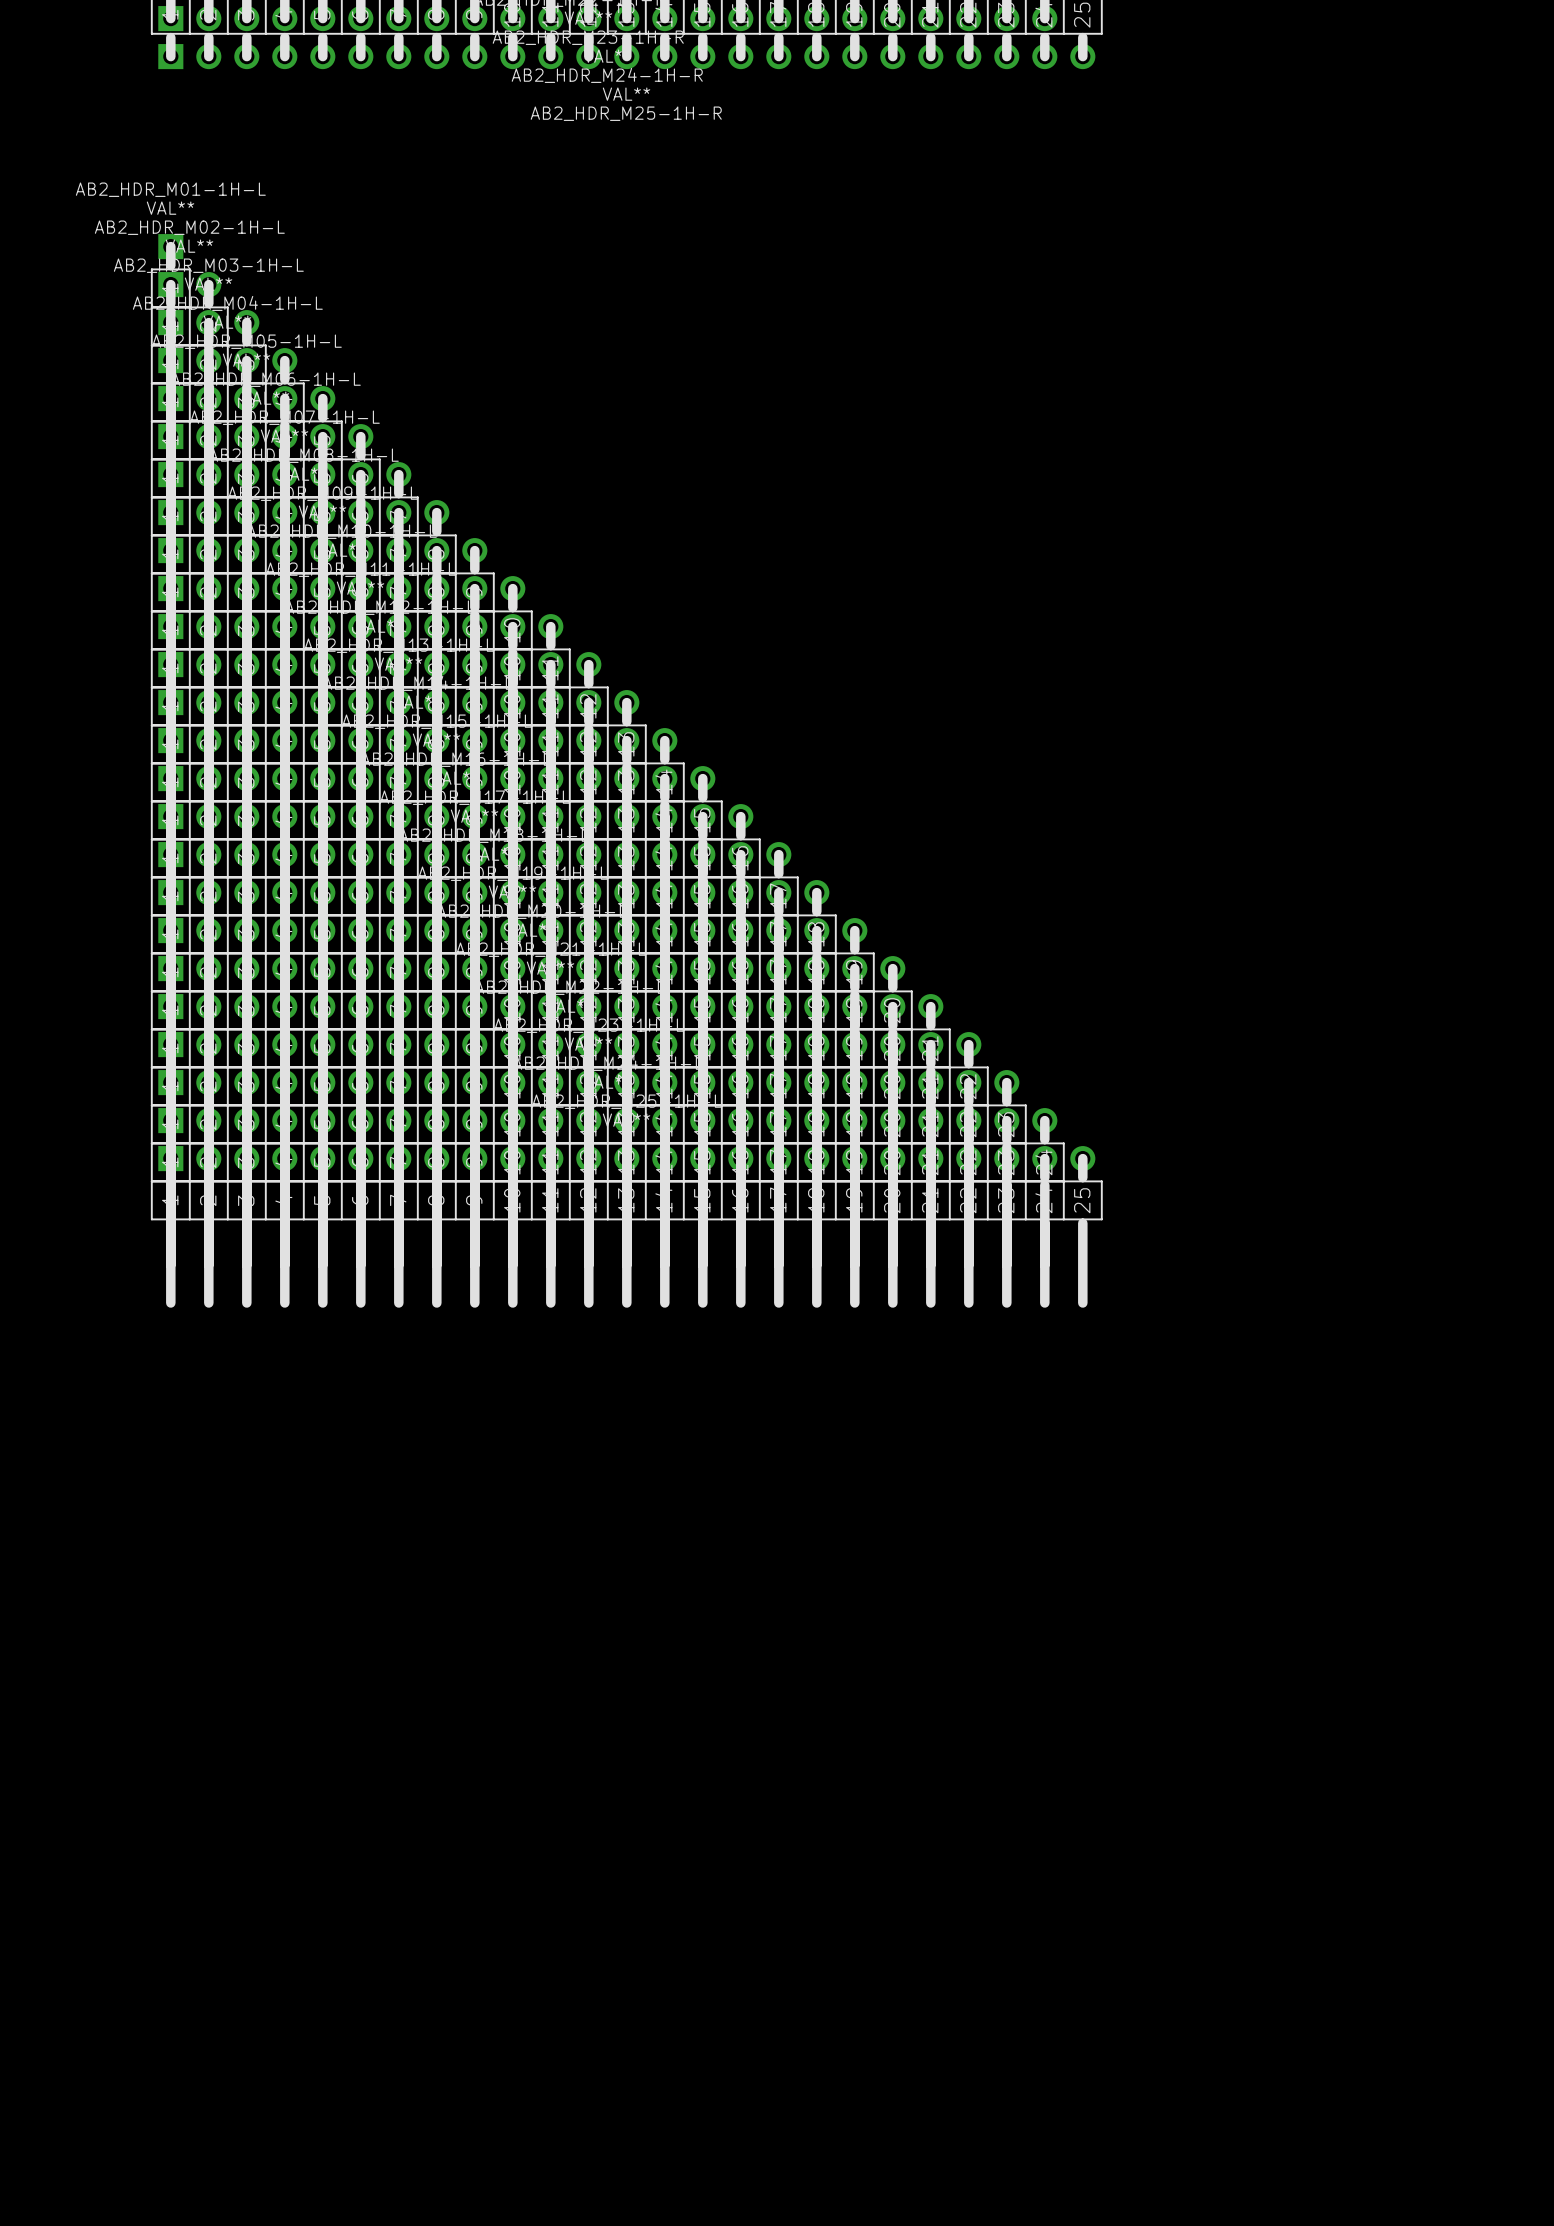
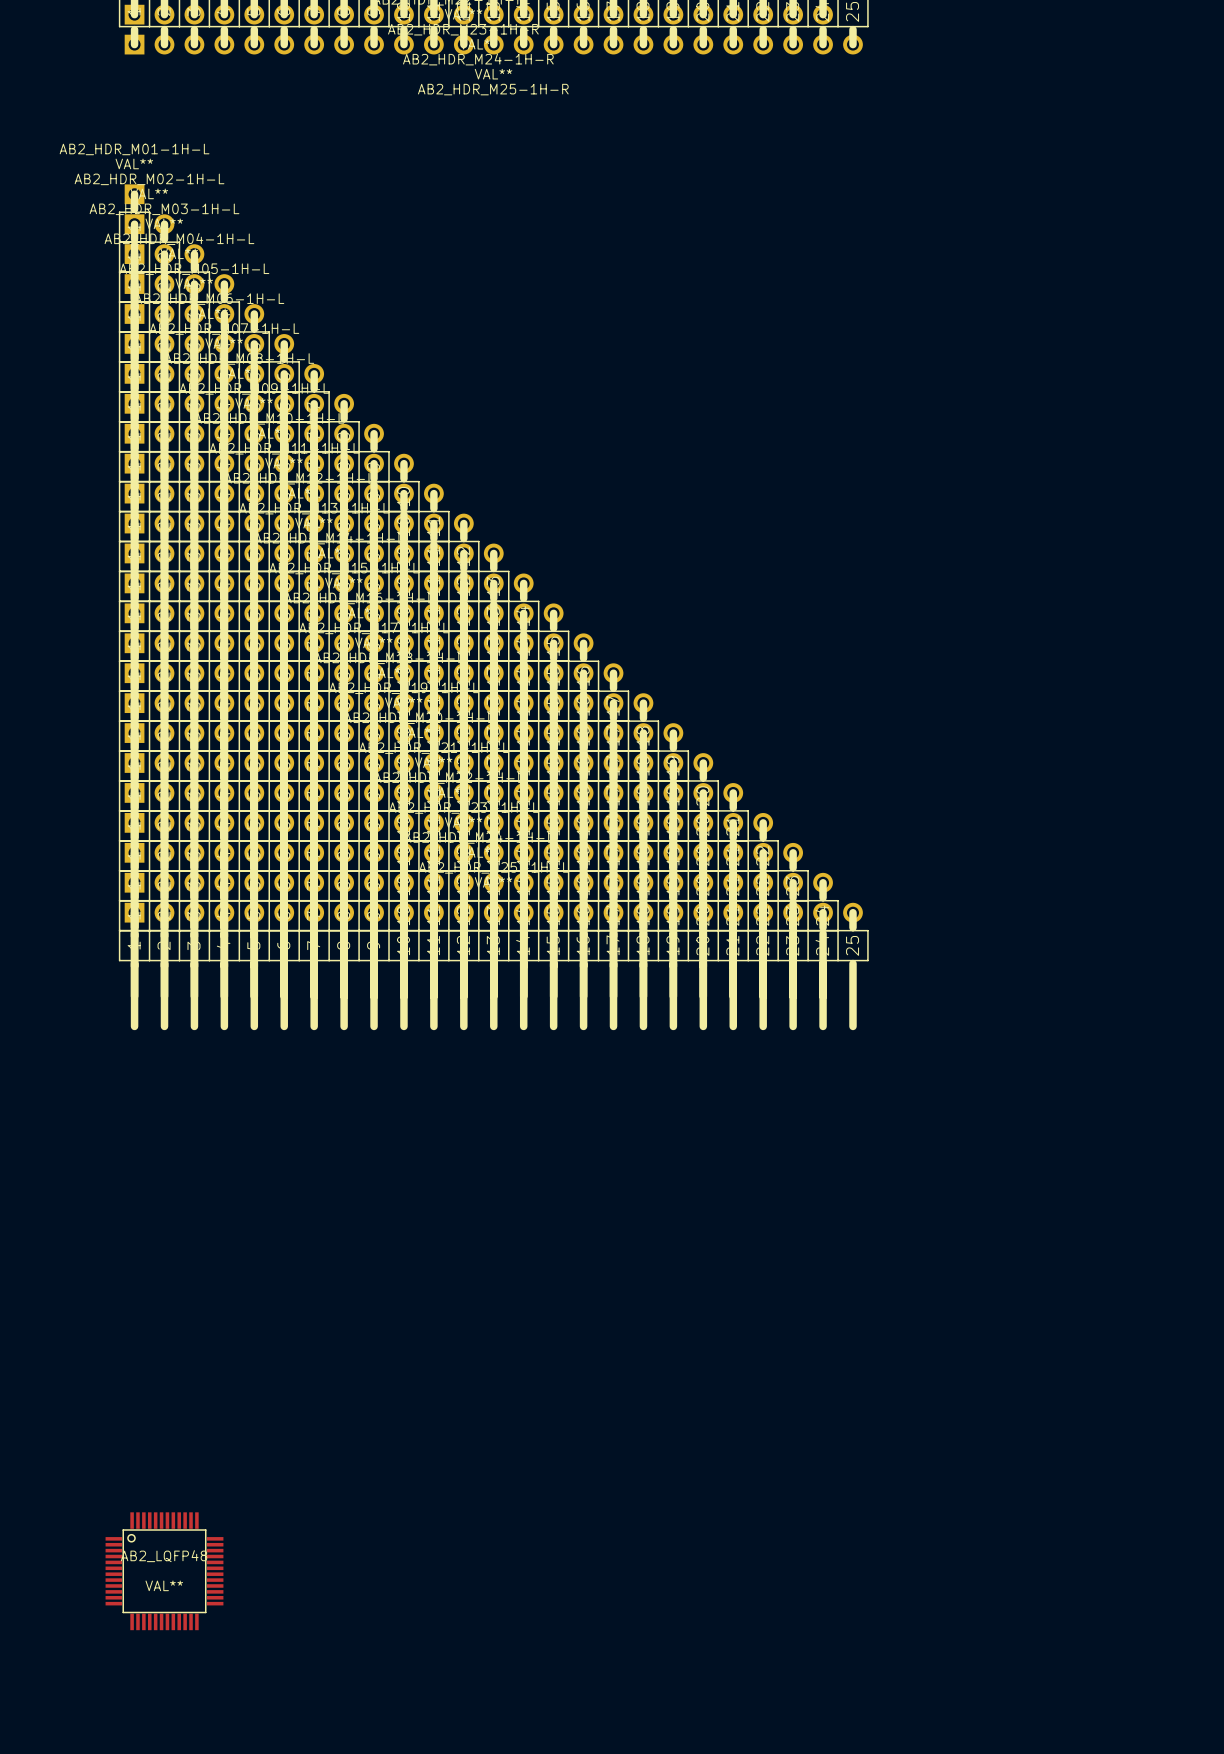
AB2_LQFP48: none -> VAL** (164, 1571)

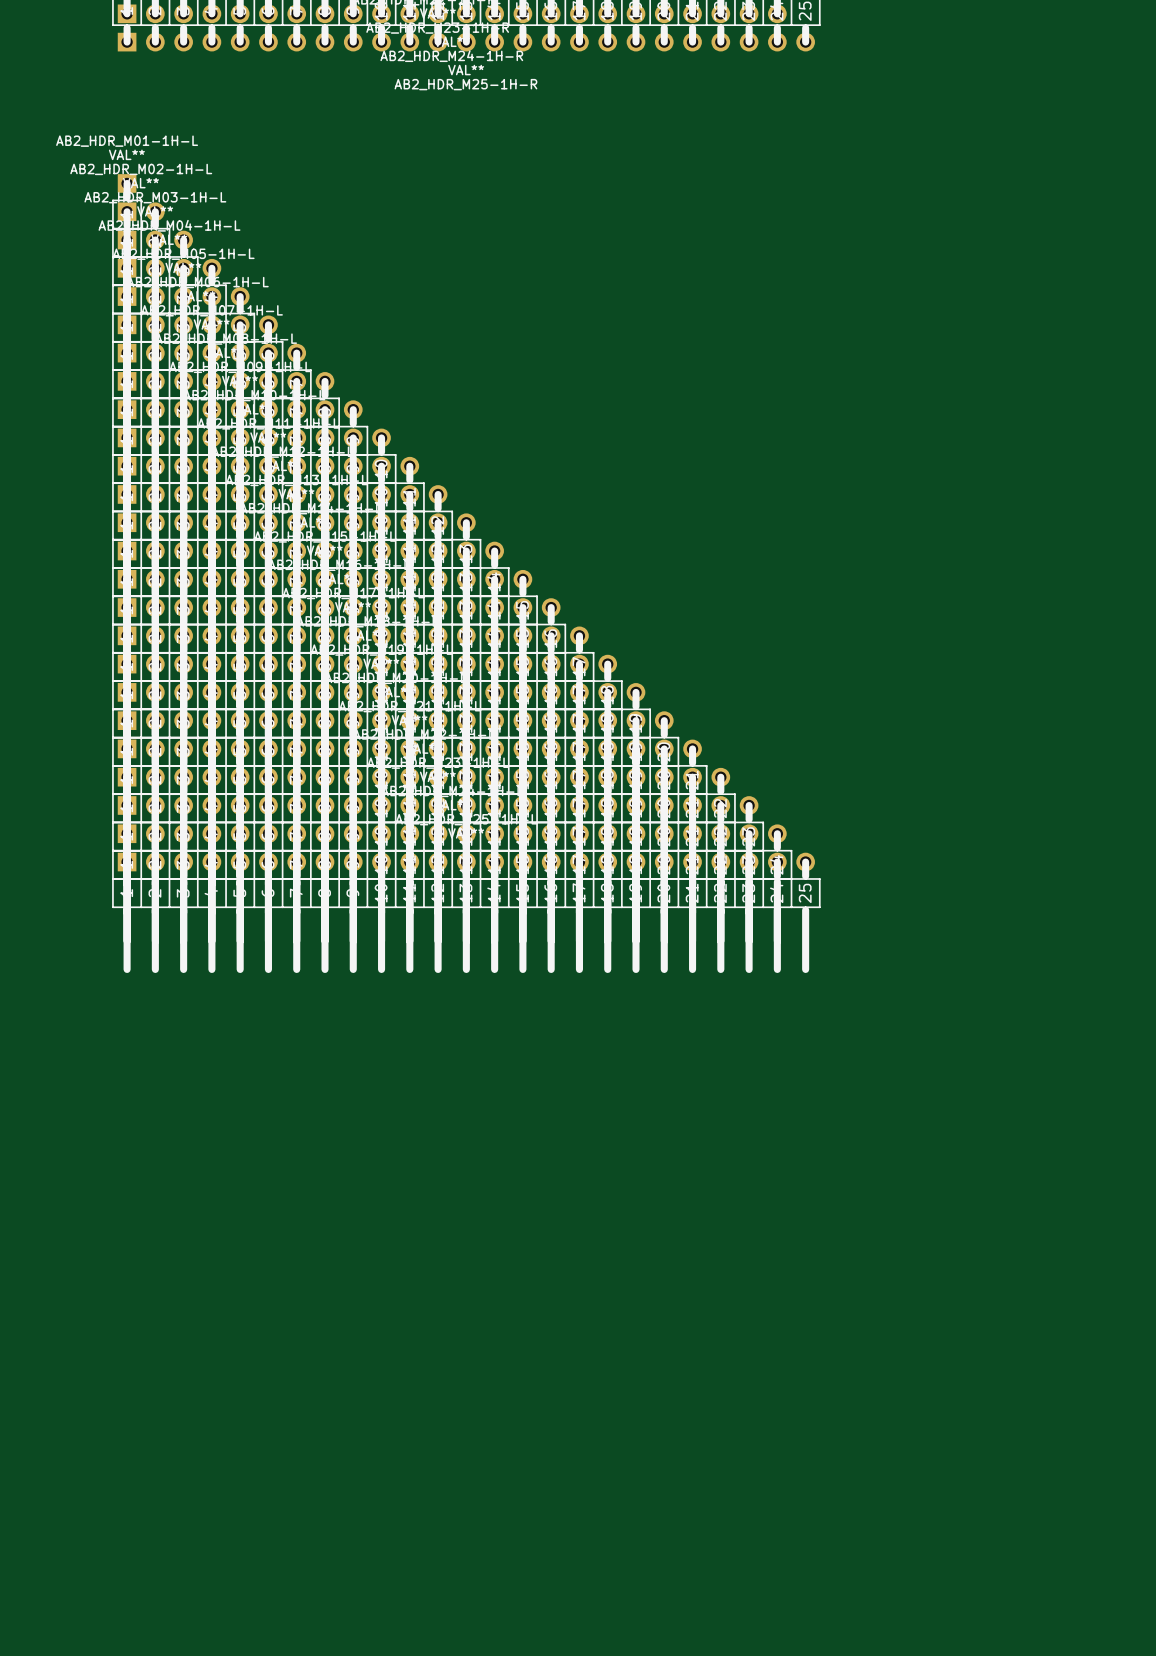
AB2_LQFP48: VAL** (164, 1571) -> none

